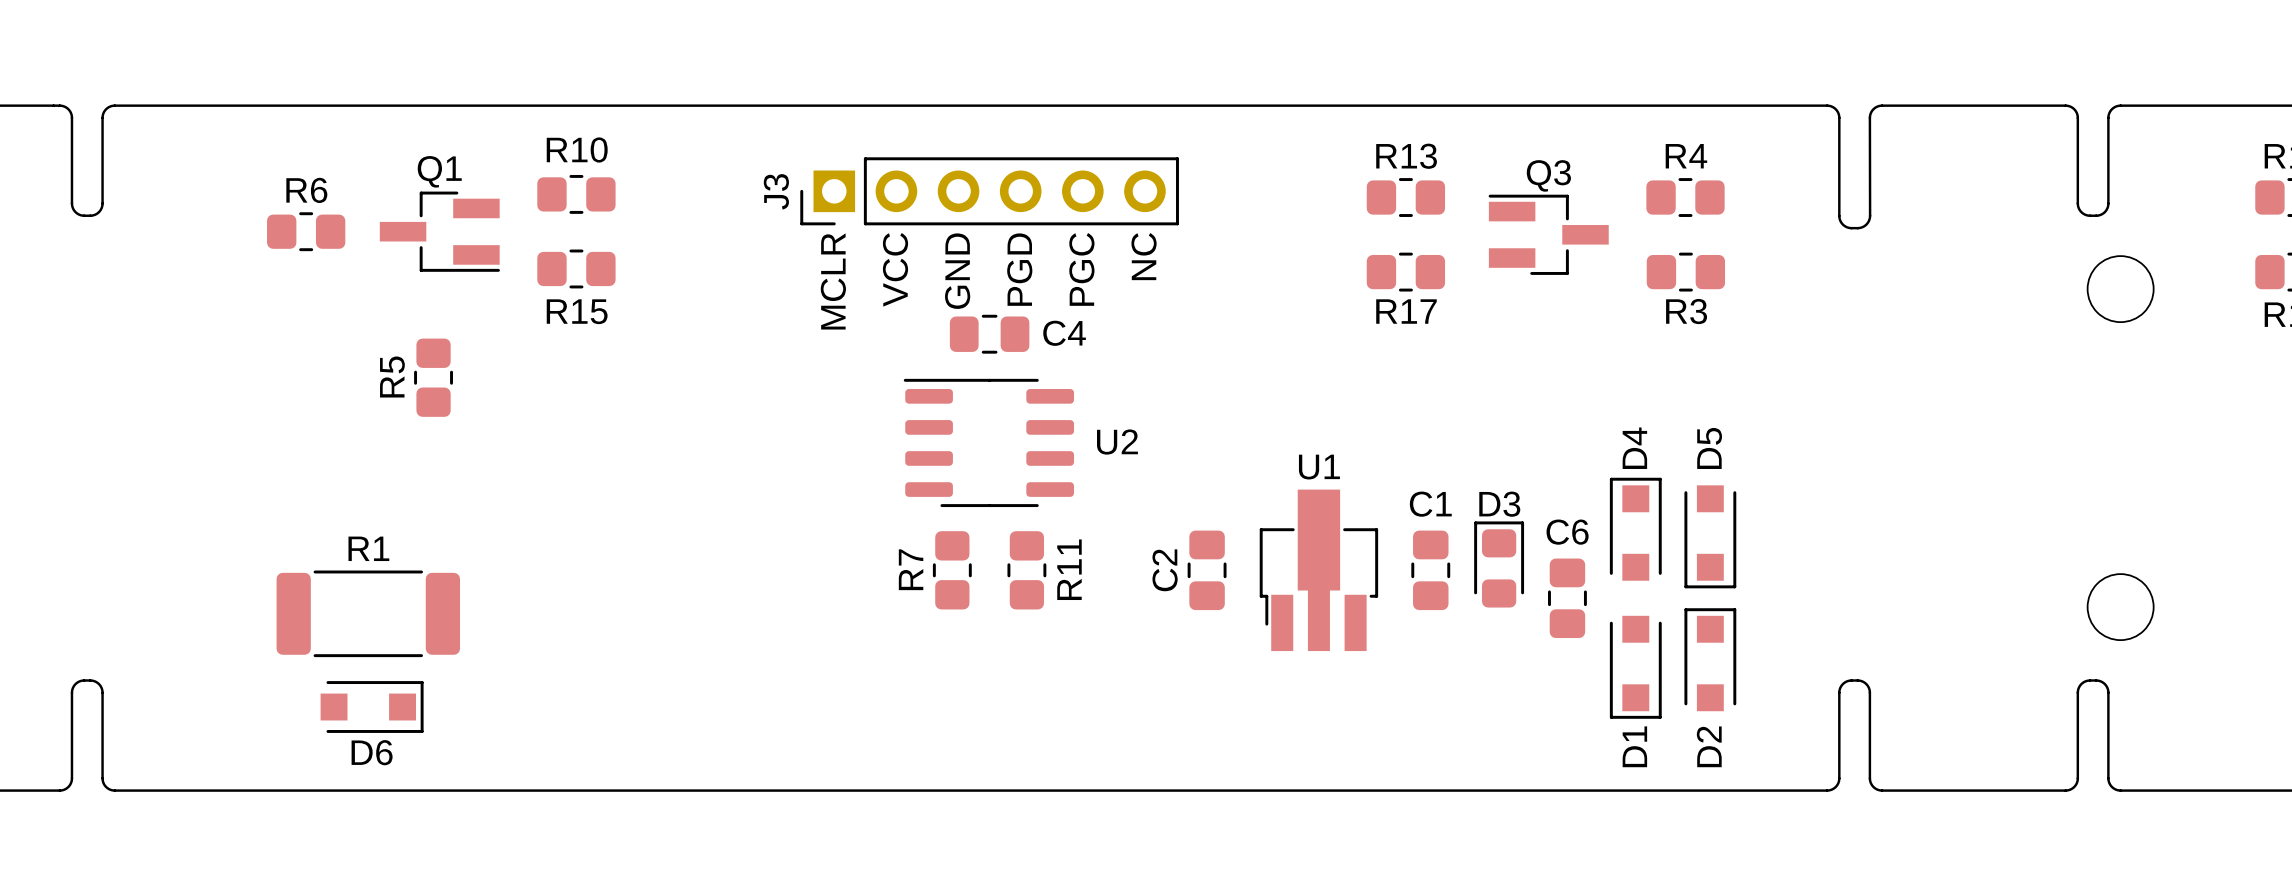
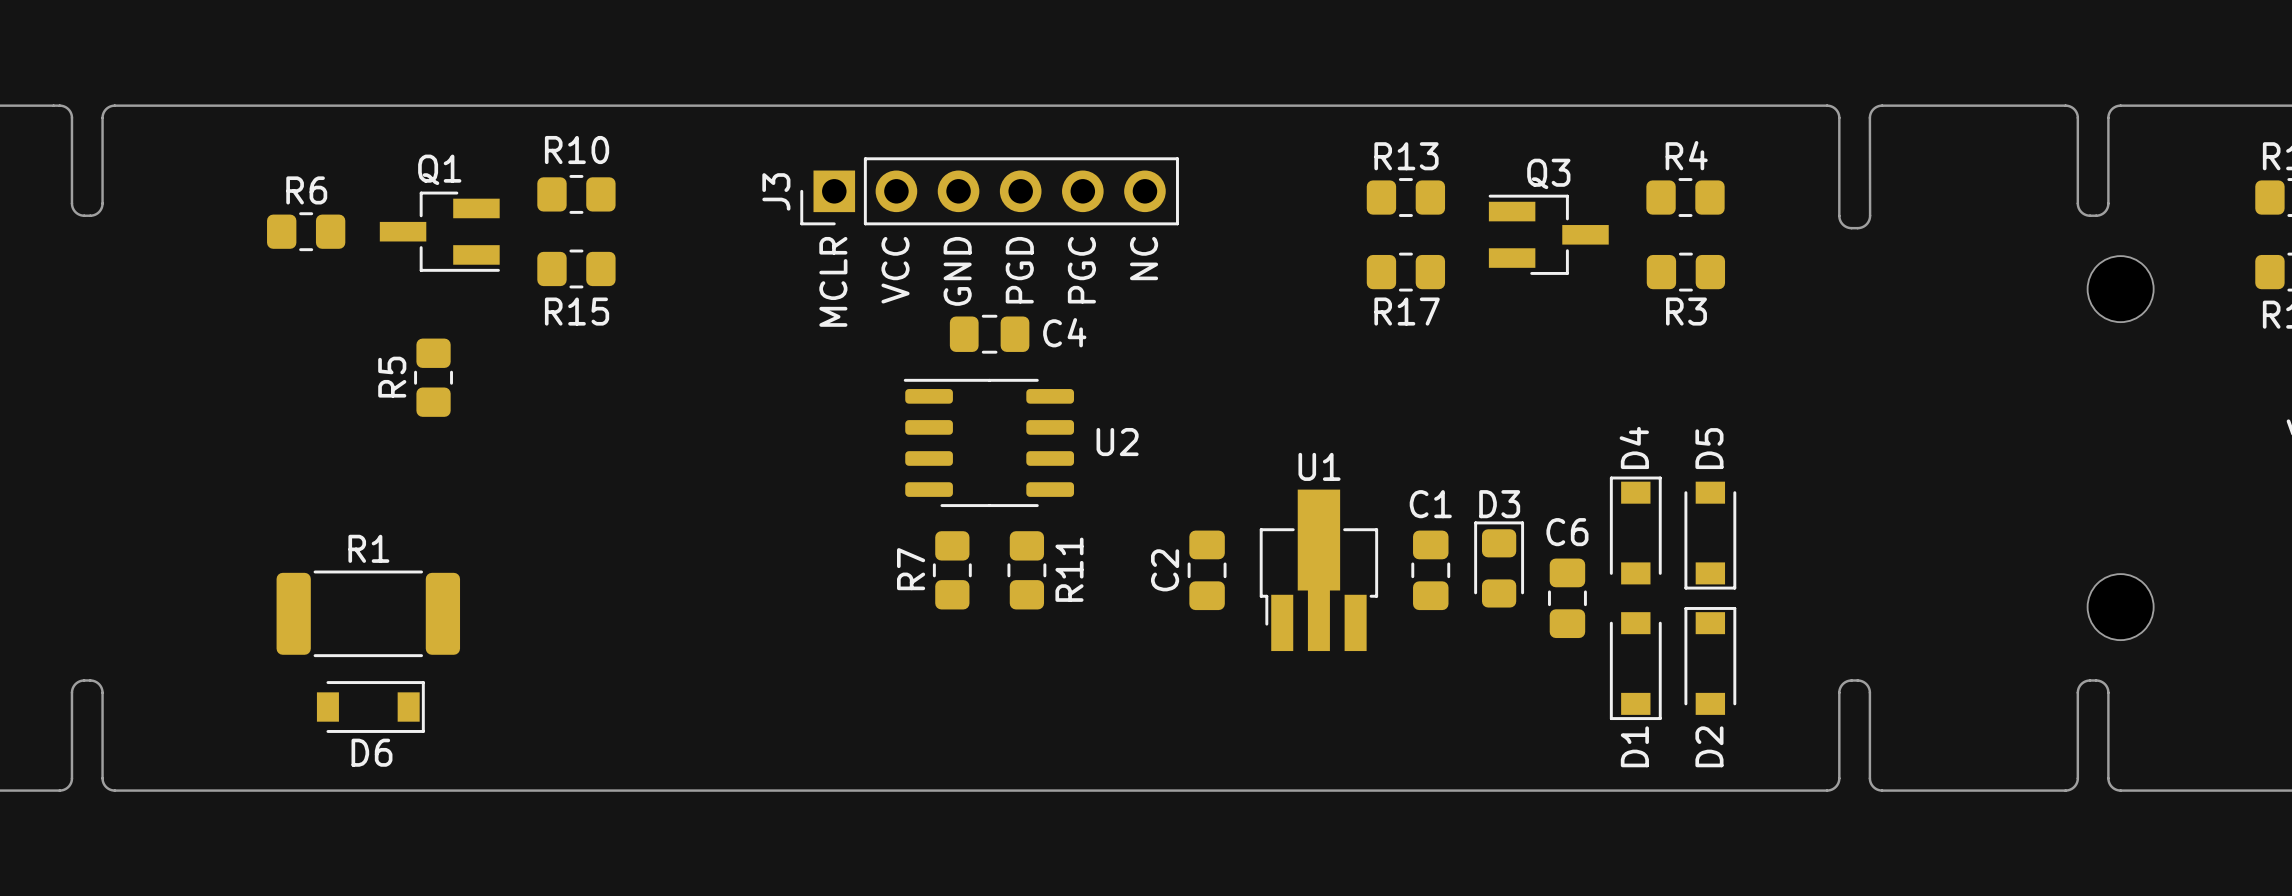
D4 footprint: [1609, 477, 1662, 581] -> [1609, 476, 1662, 585]
D5 footprint: [1684, 485, 1737, 589] -> [1684, 481, 1737, 590]
D2 footprint: [1684, 608, 1737, 712] -> [1684, 607, 1737, 715]
D1 footprint: [1609, 615, 1662, 719] -> [1609, 612, 1662, 721]
D6 footprint: [320, 681, 424, 733] -> [316, 681, 425, 733]

